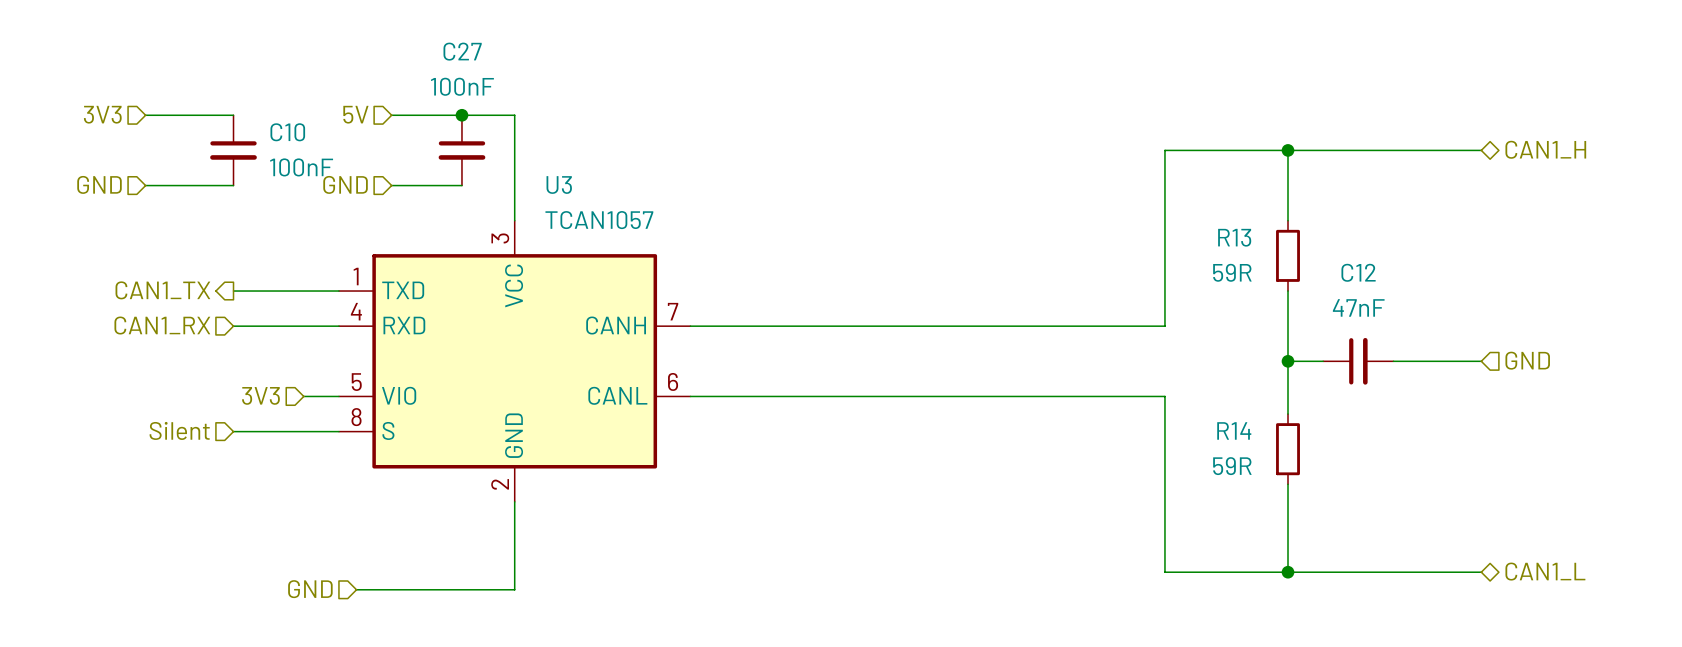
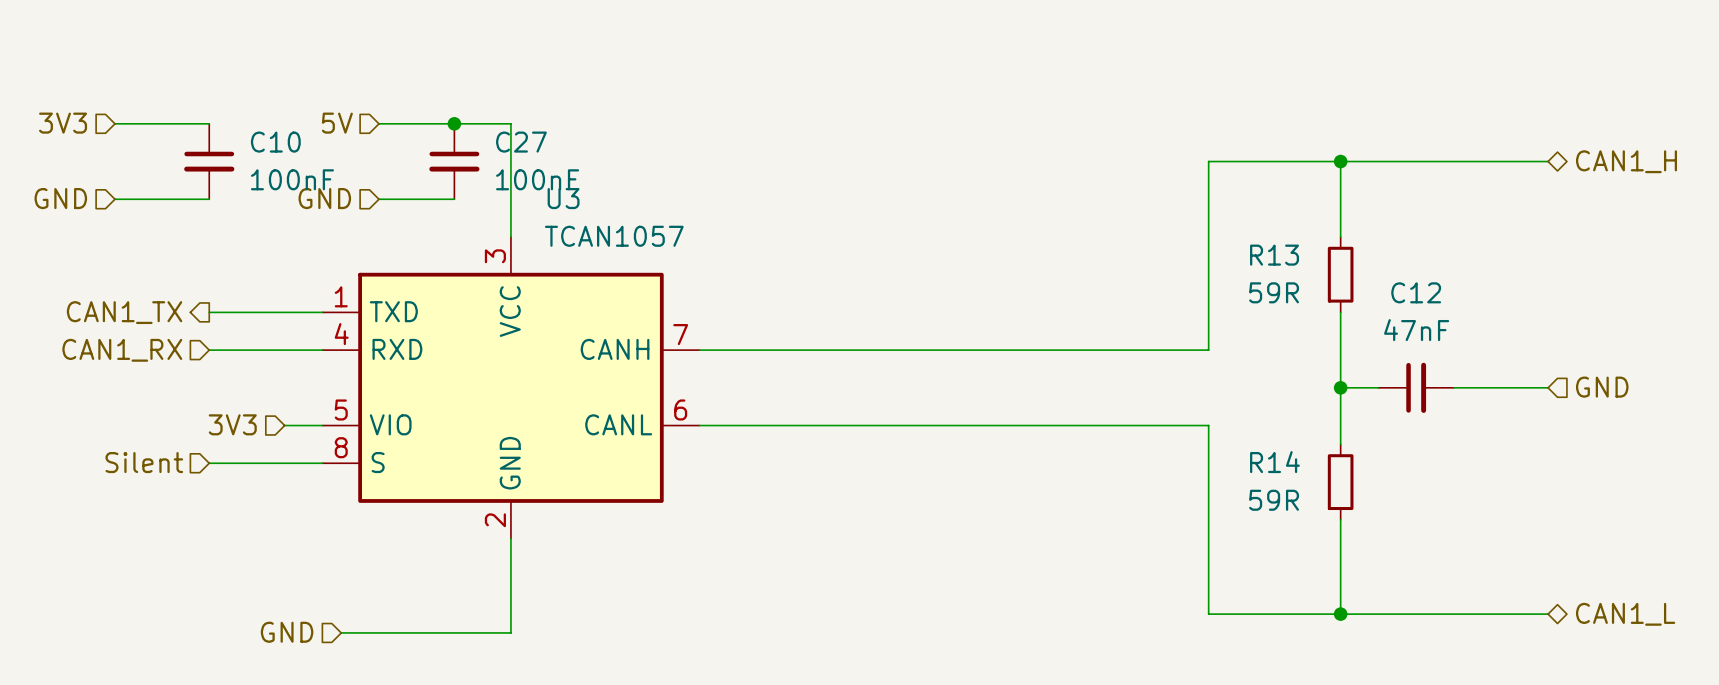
C27 name position: C27 (462, 51) -> C27 (521, 142)
C27 value position: 100nF (462, 86) -> 100nF (537, 179)

